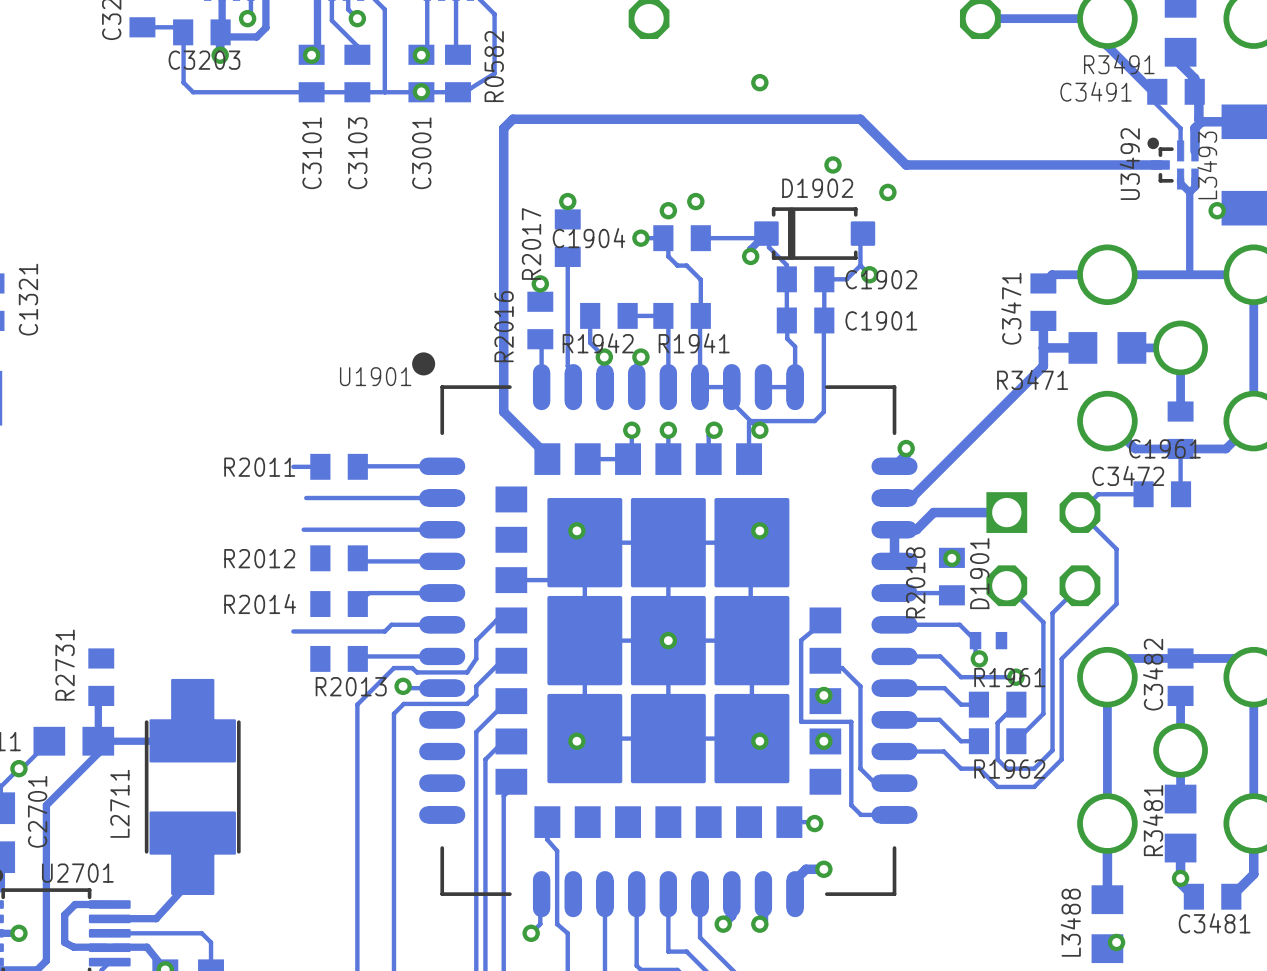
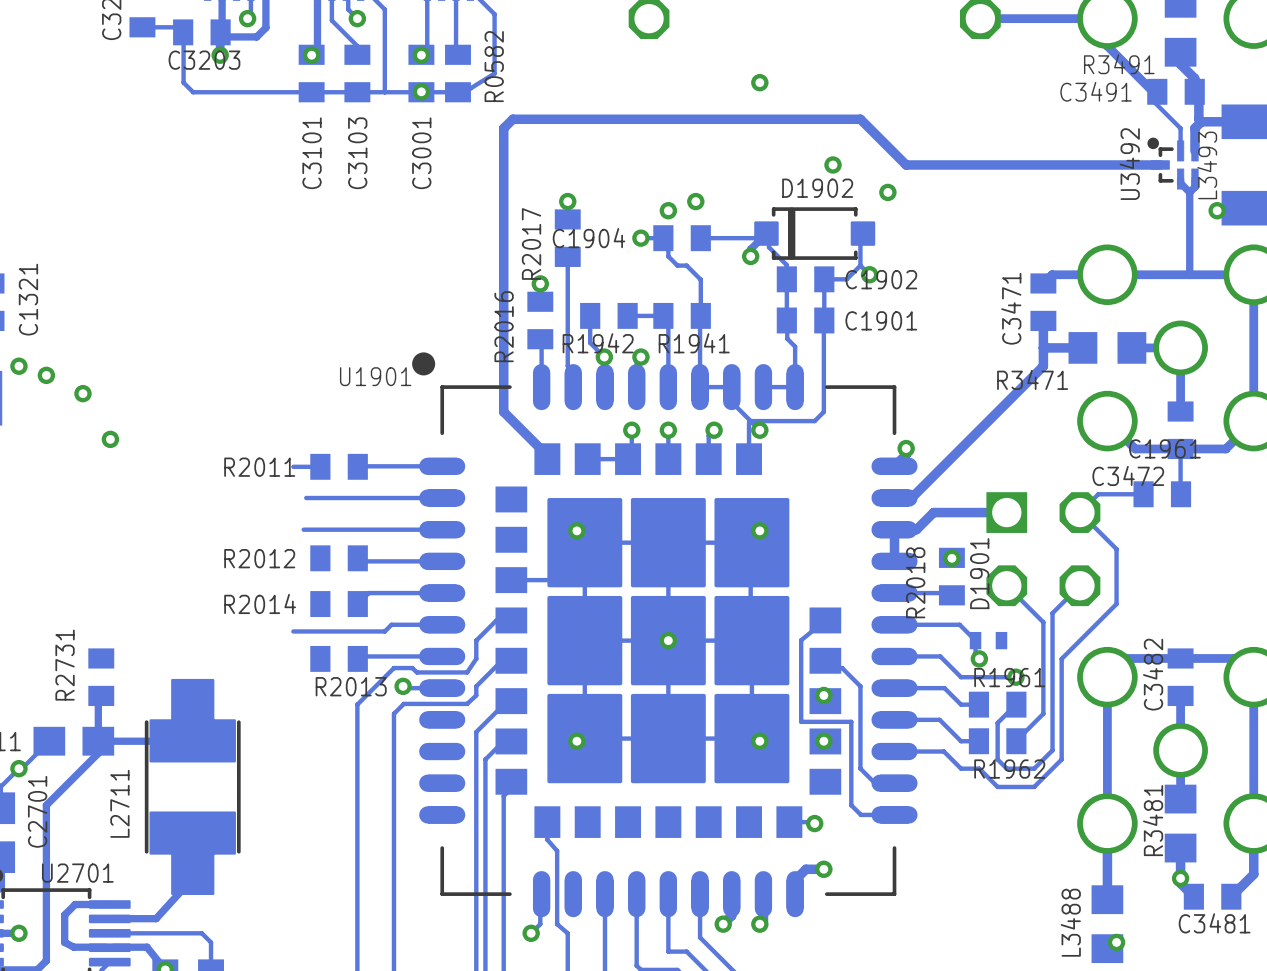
via: none -> (18, 366)
via: none -> (46, 375)
via: none -> (82, 393)
via: none -> (110, 439)

